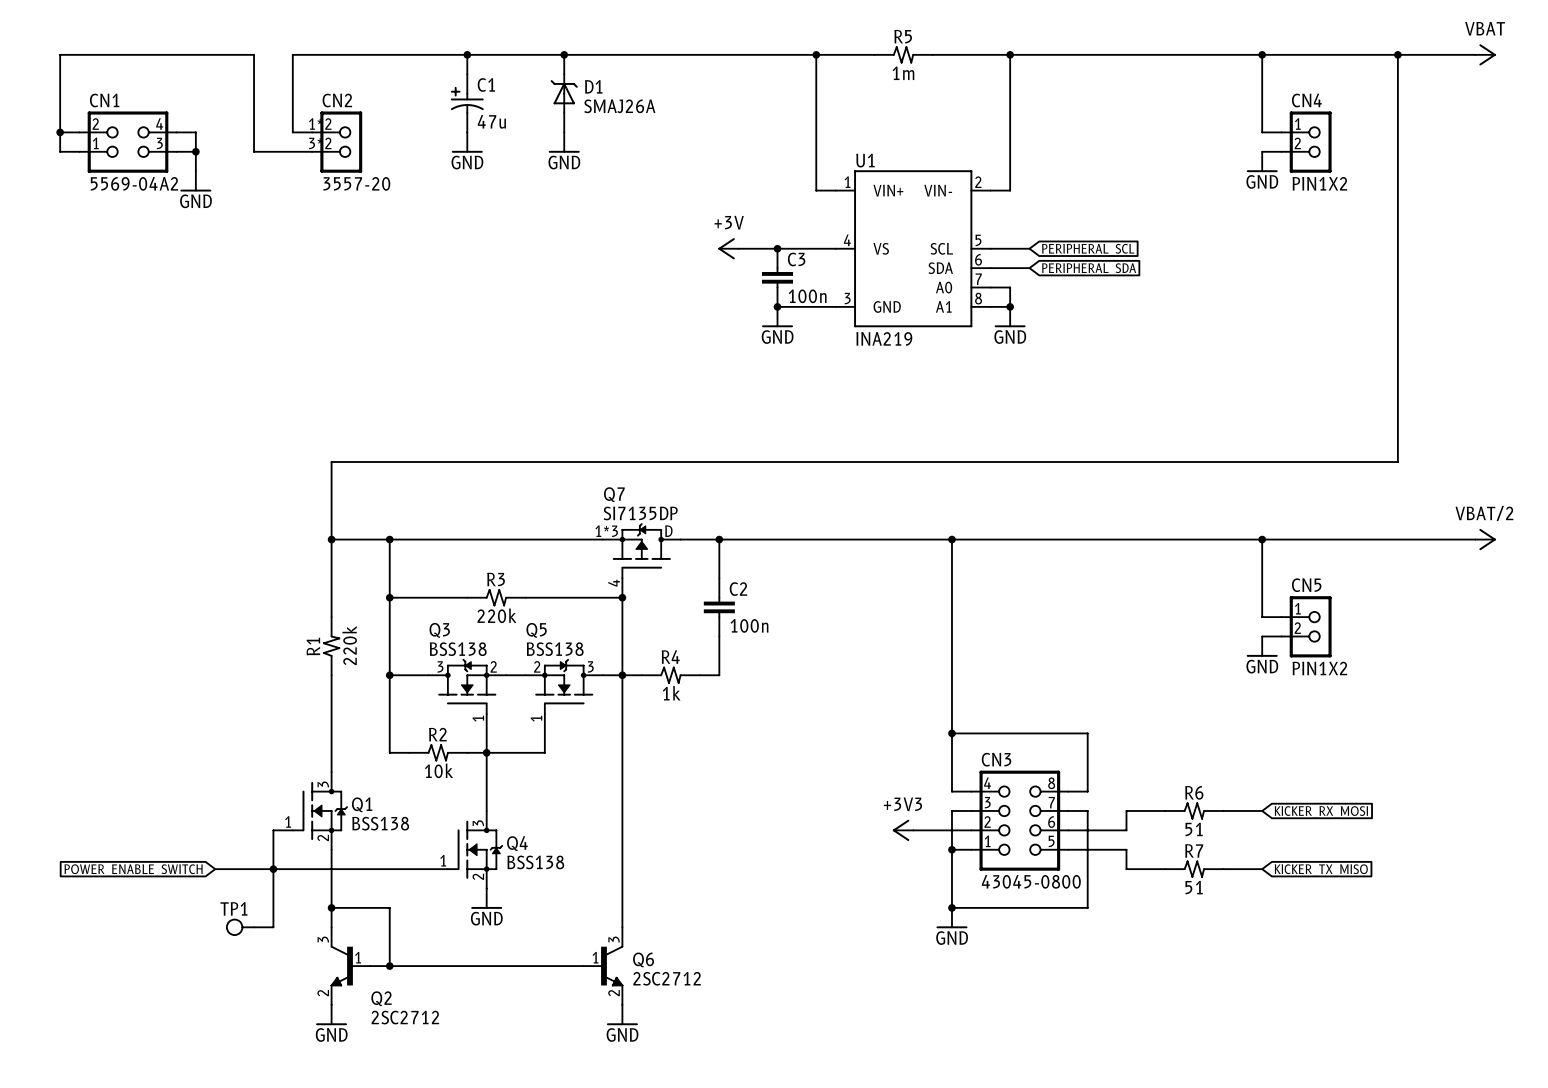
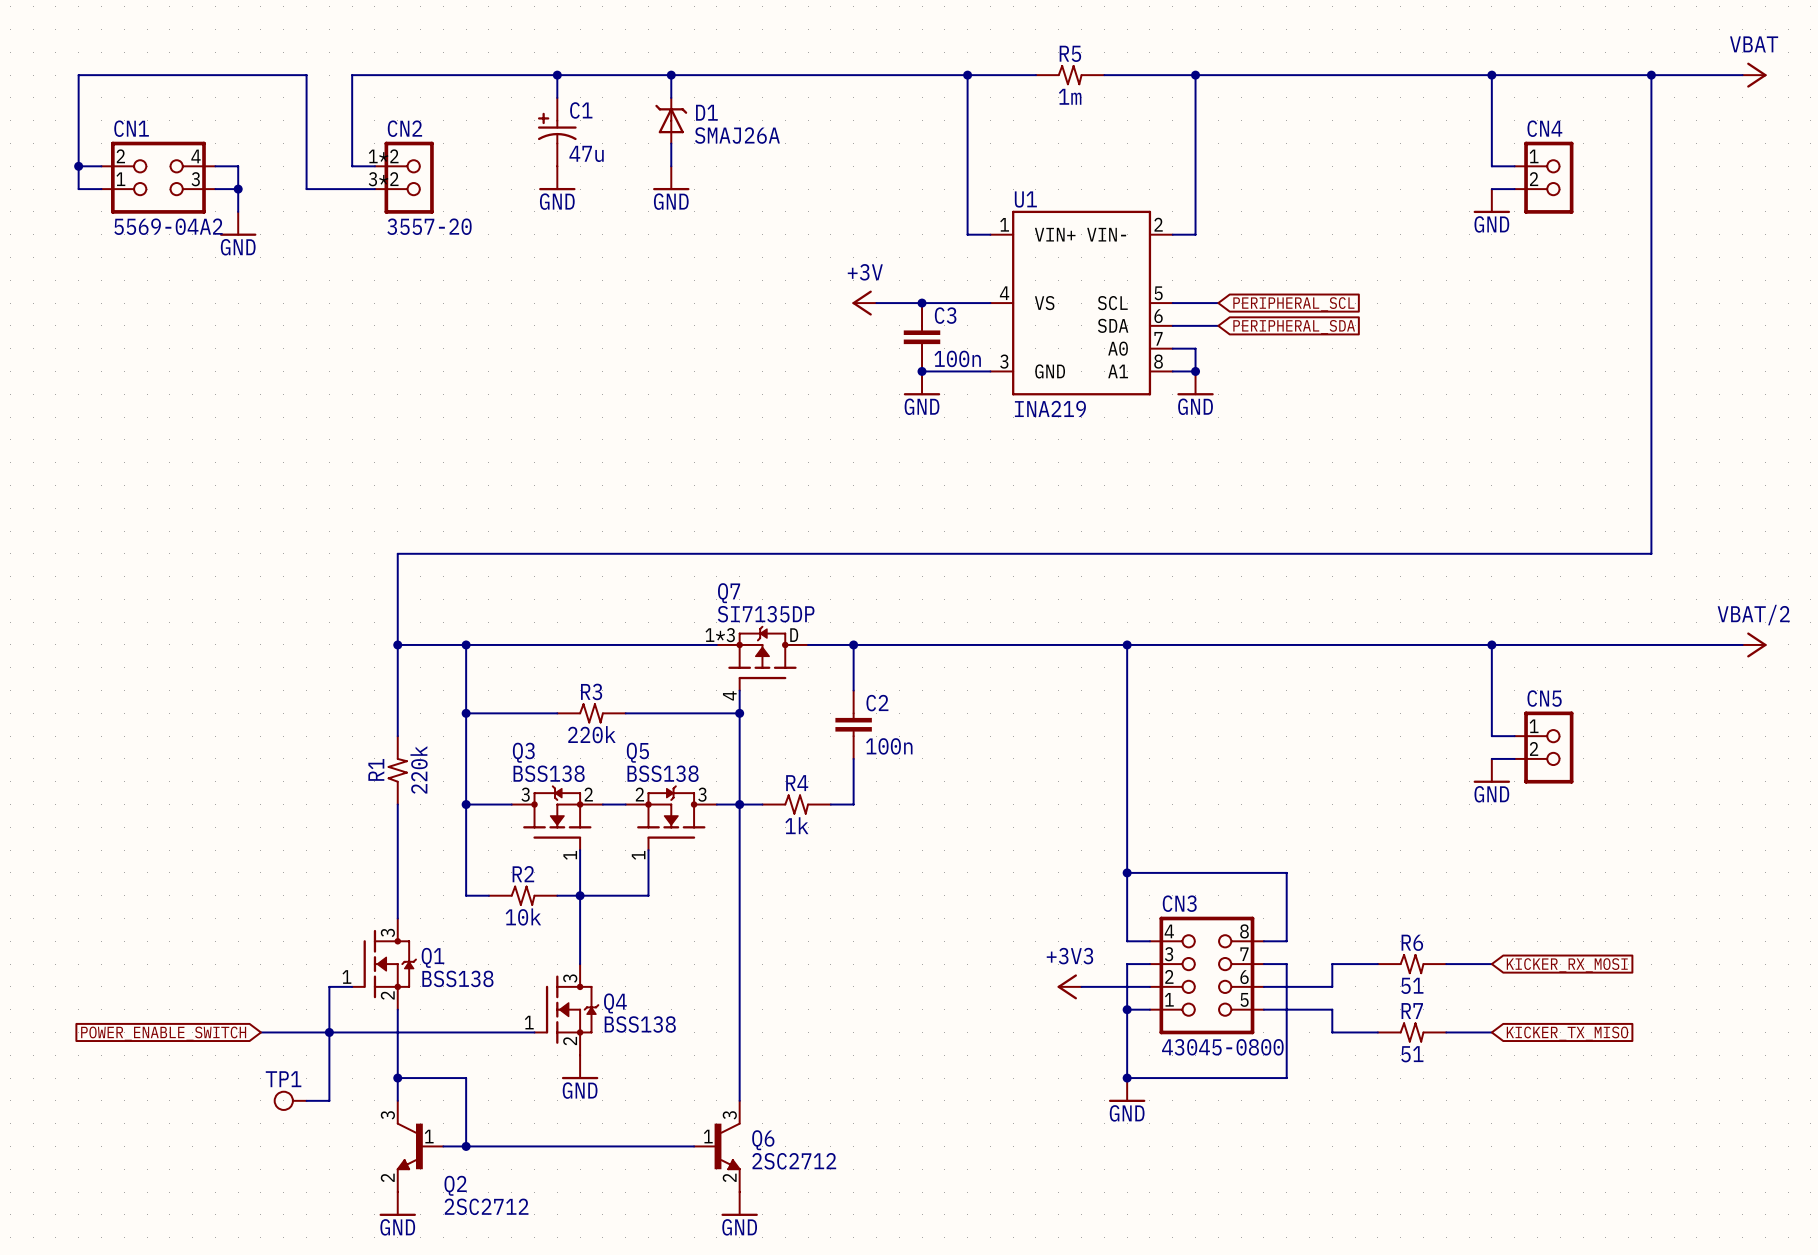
CN4 value: PIN1X2 (1319, 183) -> none
CN5 value: PIN1X2 (1319, 668) -> none

